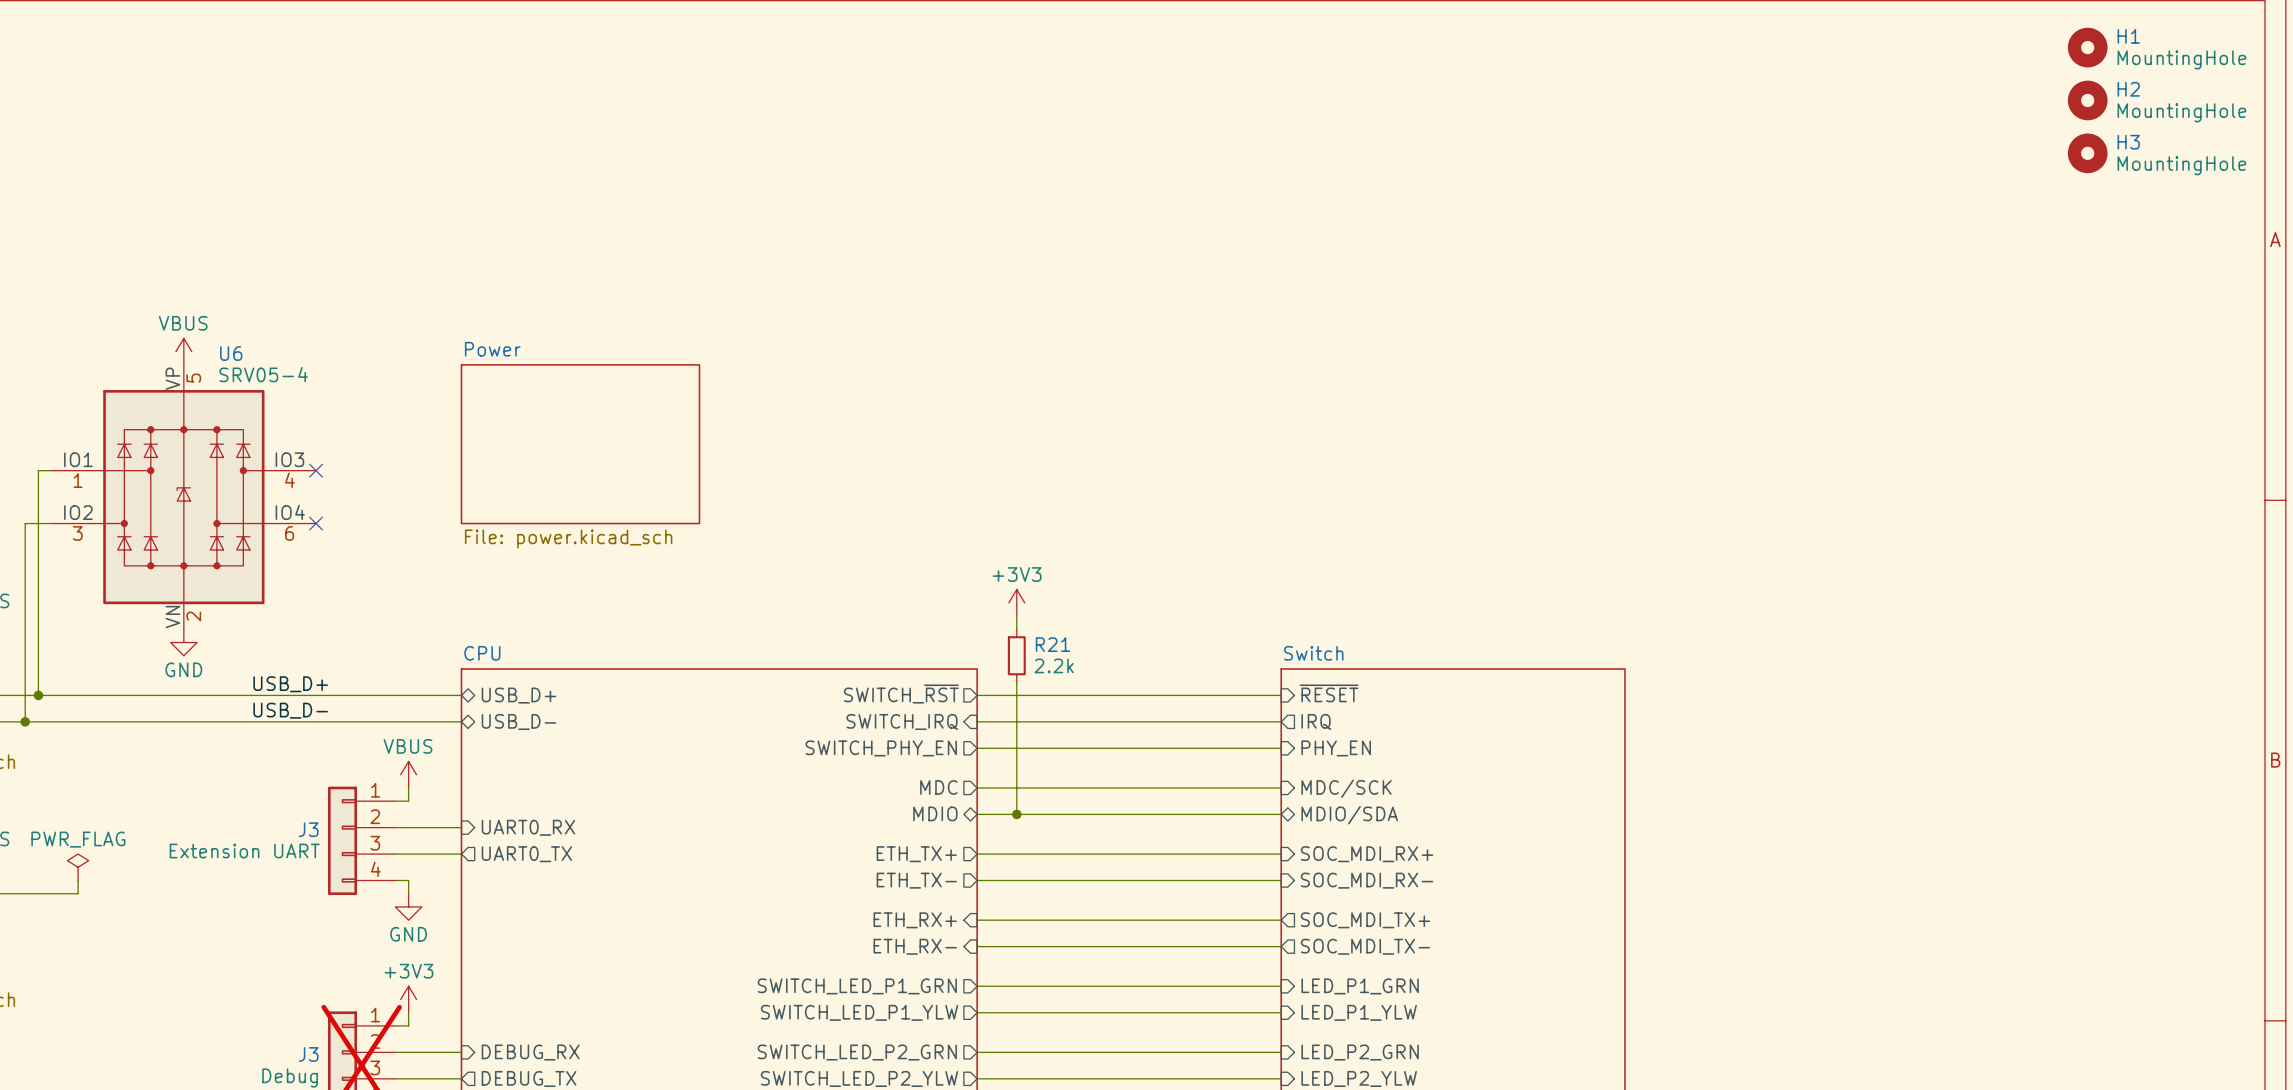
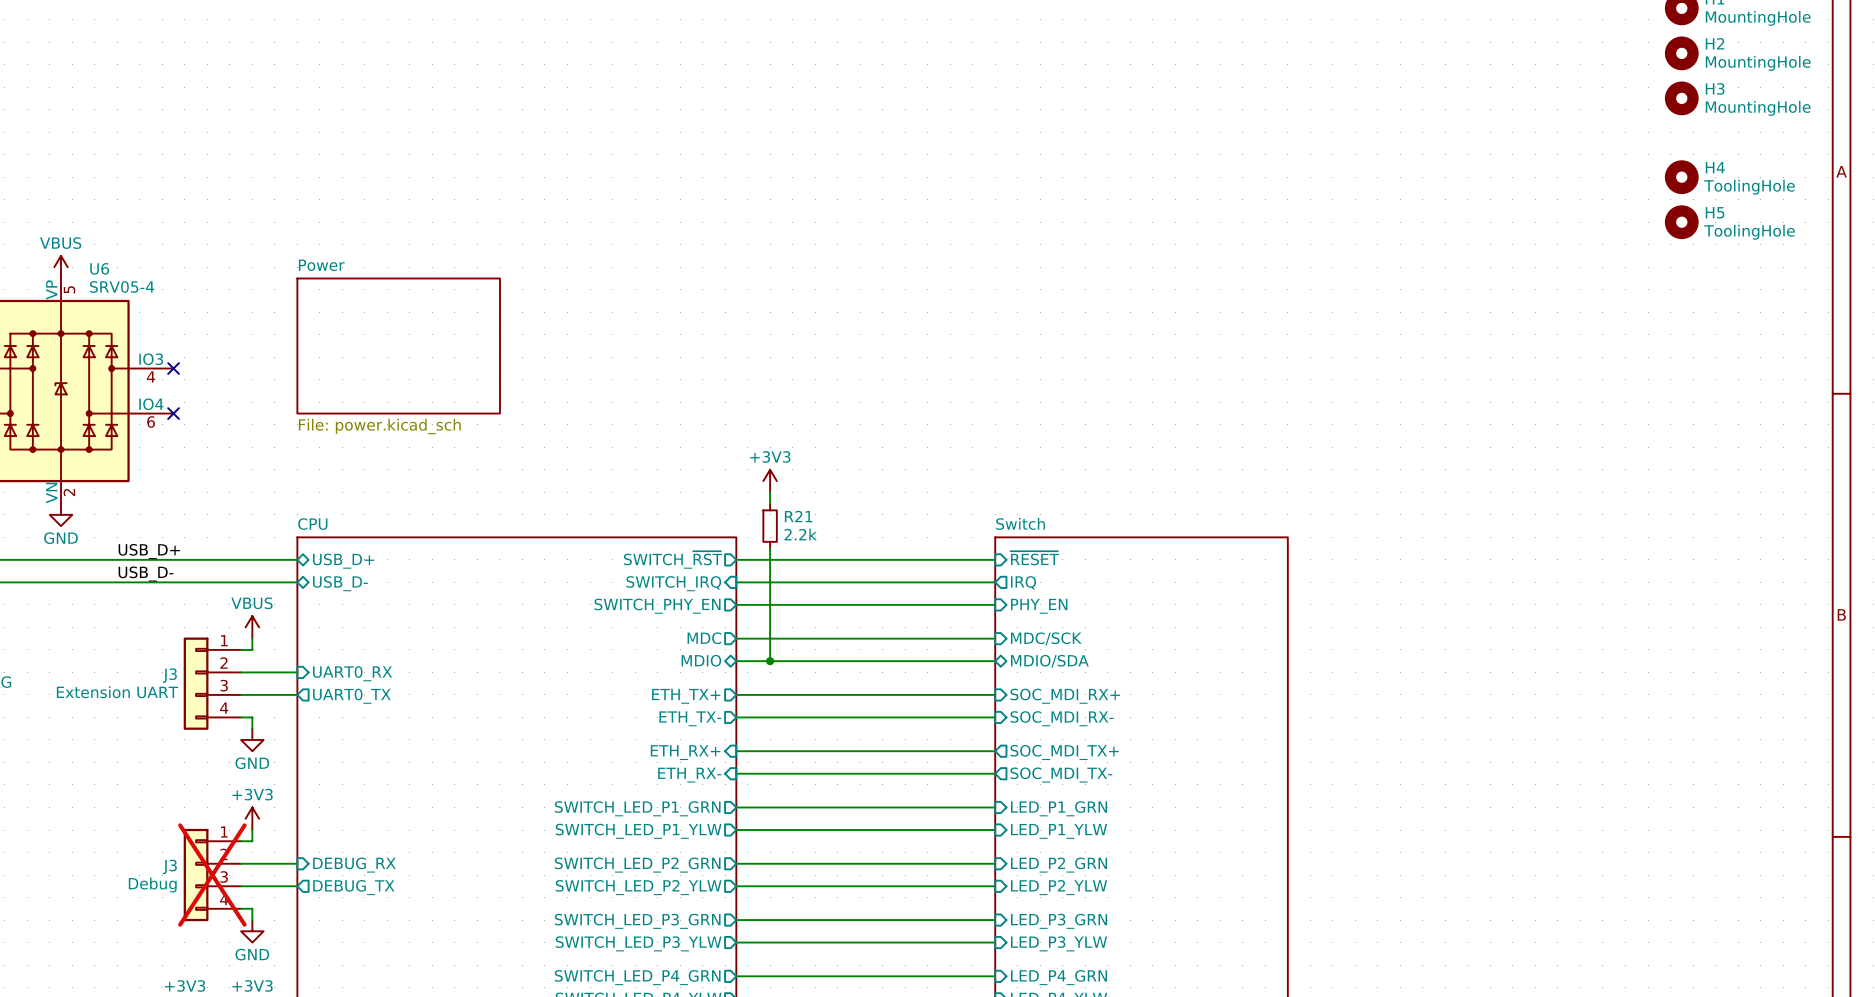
H4: none -> ToolingHole (1681, 177)
H5: none -> ToolingHole (1681, 222)

